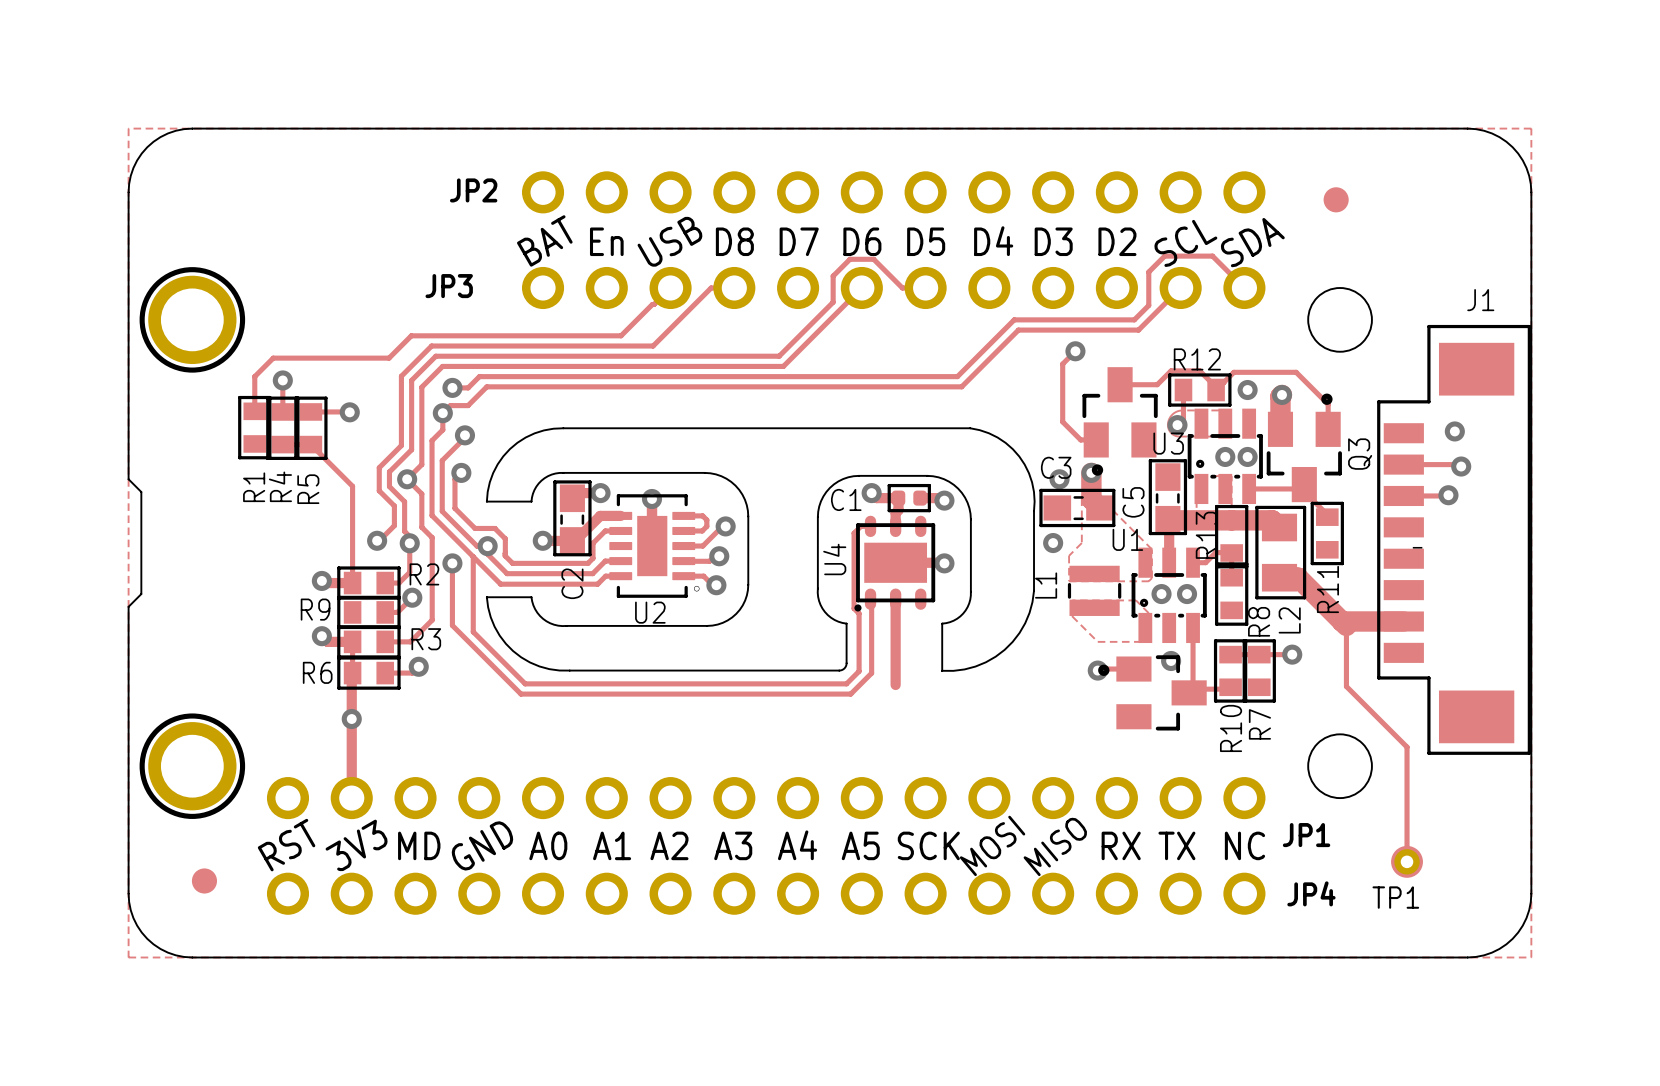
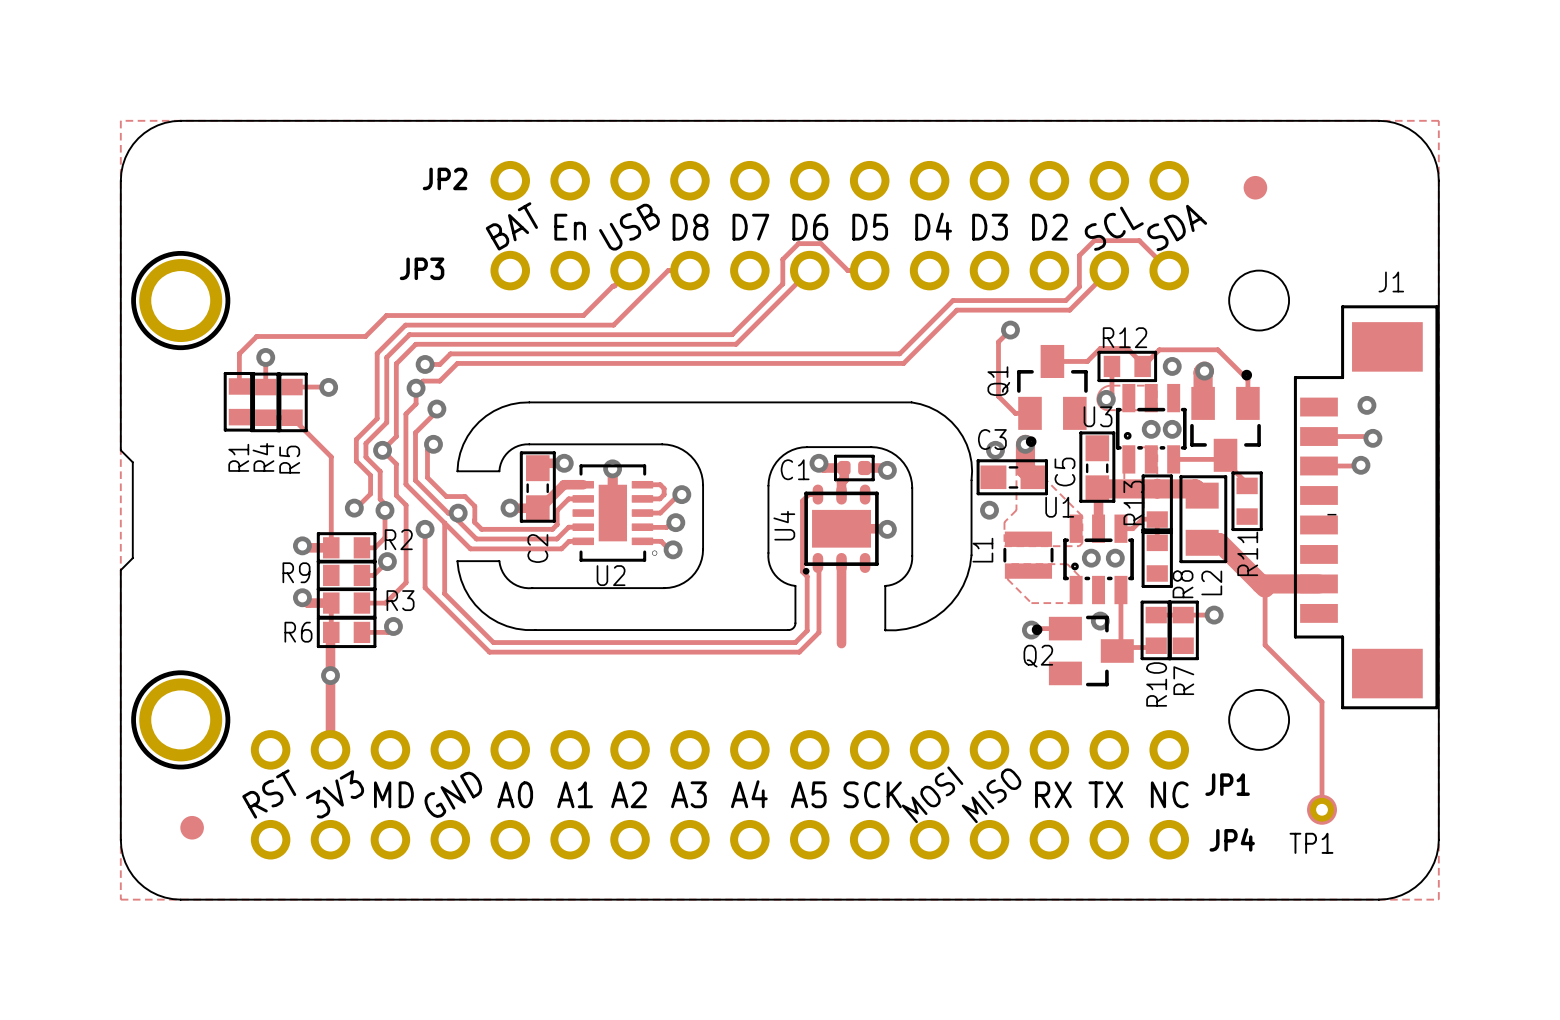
Q1 name: none -> Q1 (998, 381)
Q3 name: Q3 (1360, 454) -> none
Q2 name: none -> Q2 (1038, 656)

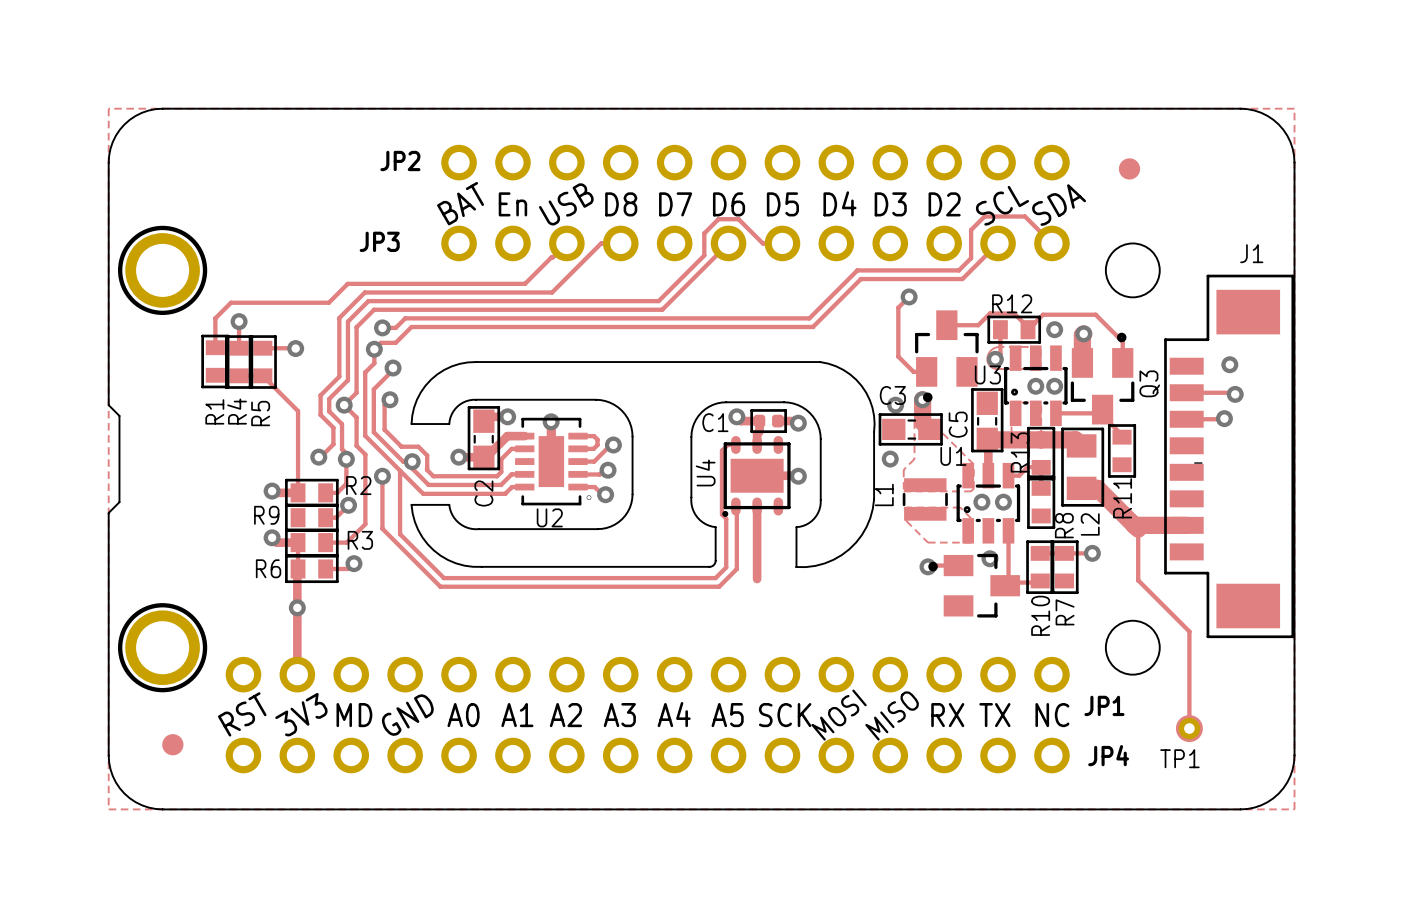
Q1 name: Q1 (998, 381) -> none
Q3 name: none -> Q3 (1149, 383)
Q2 name: Q2 (1038, 656) -> none

